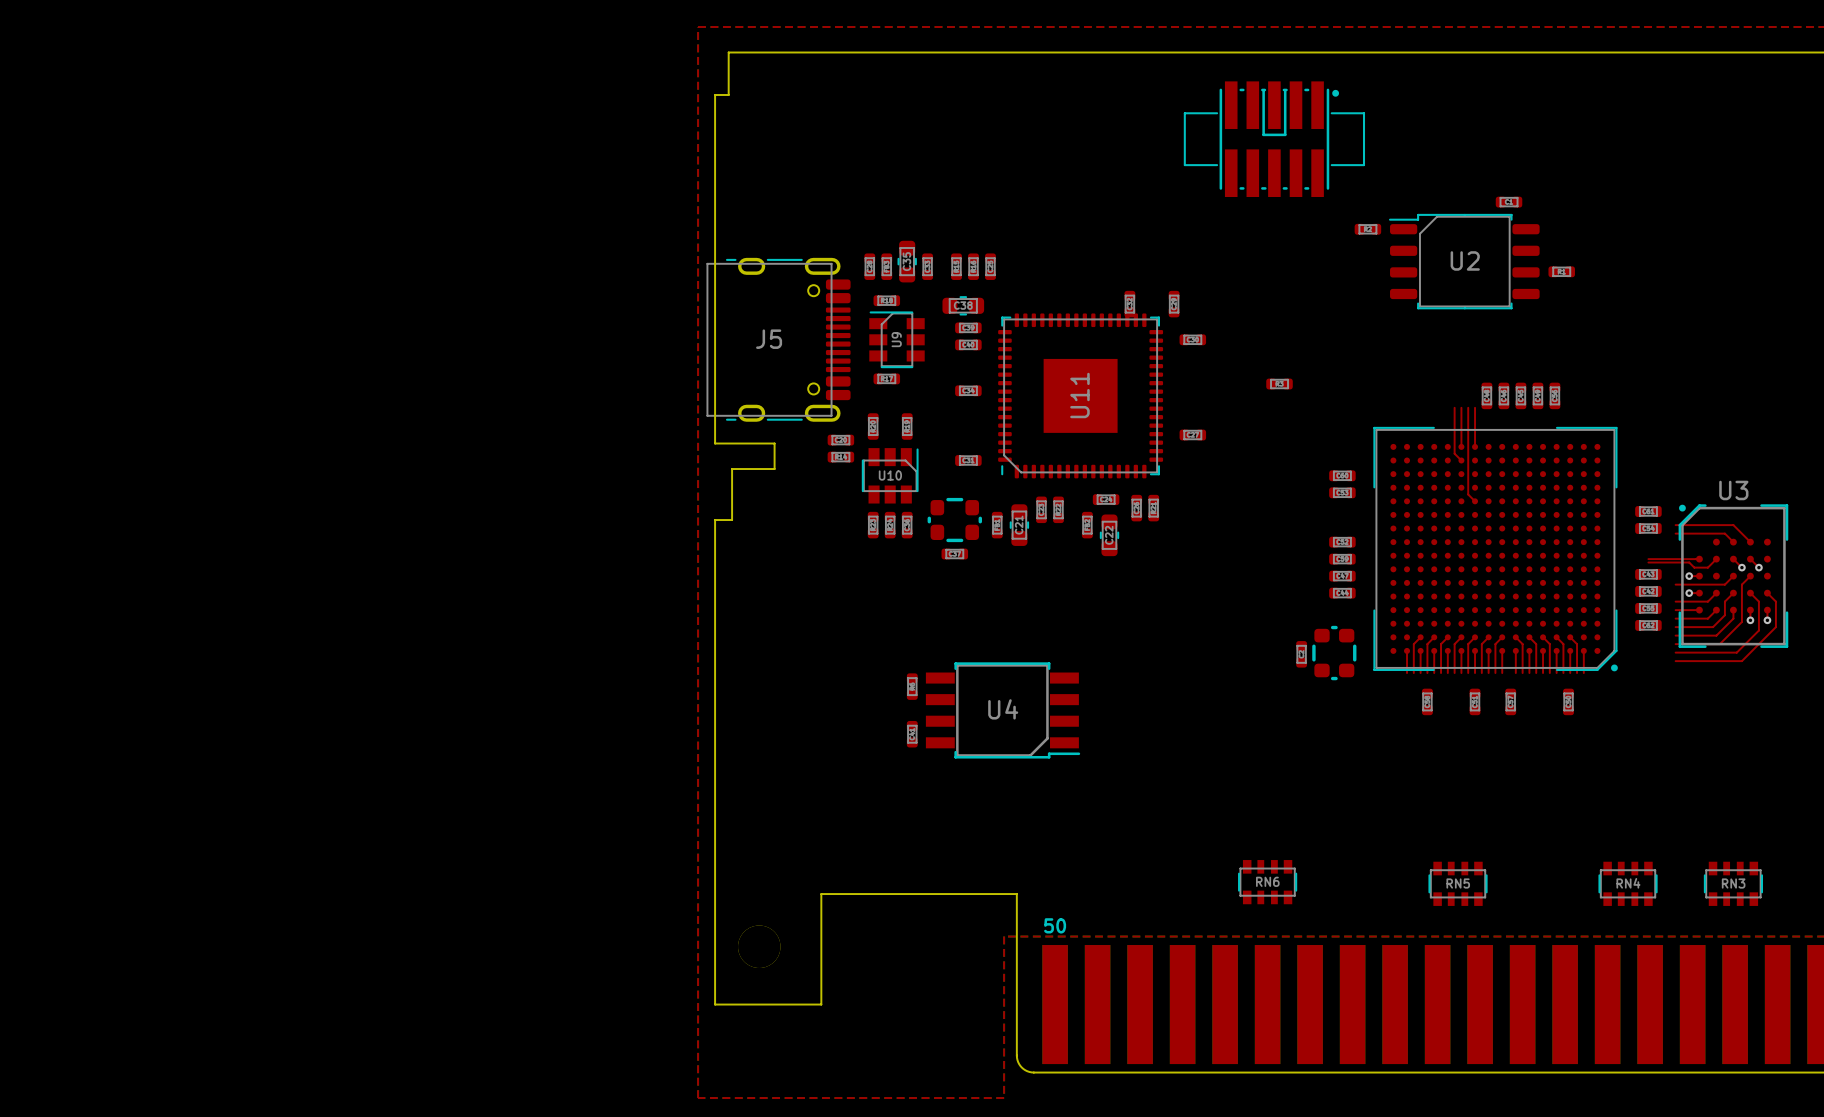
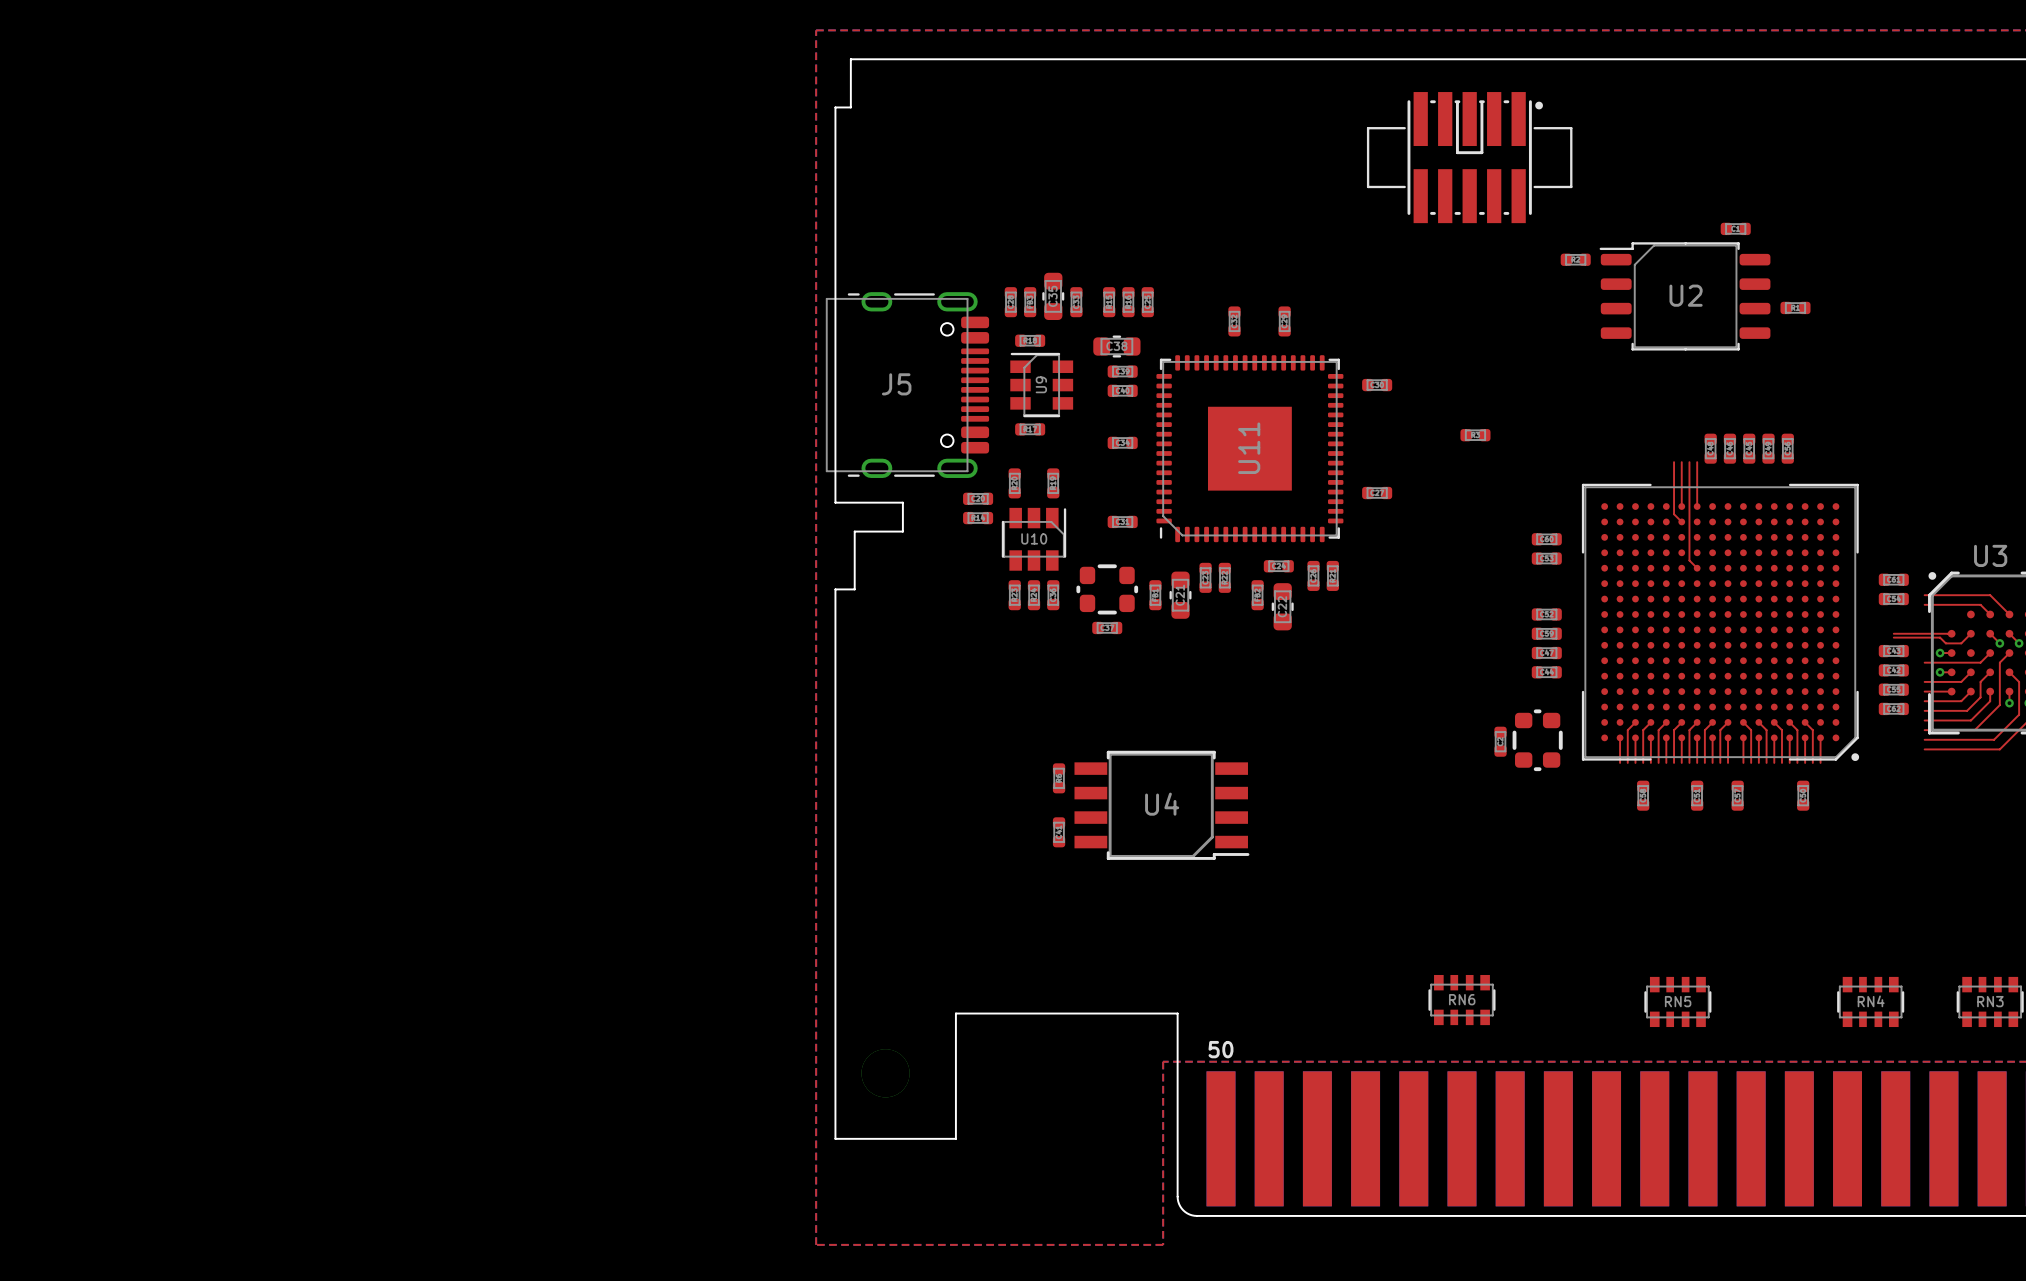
part position: (1129, 304) -> (1234, 321)
part position: (1174, 304) -> (1284, 321)

